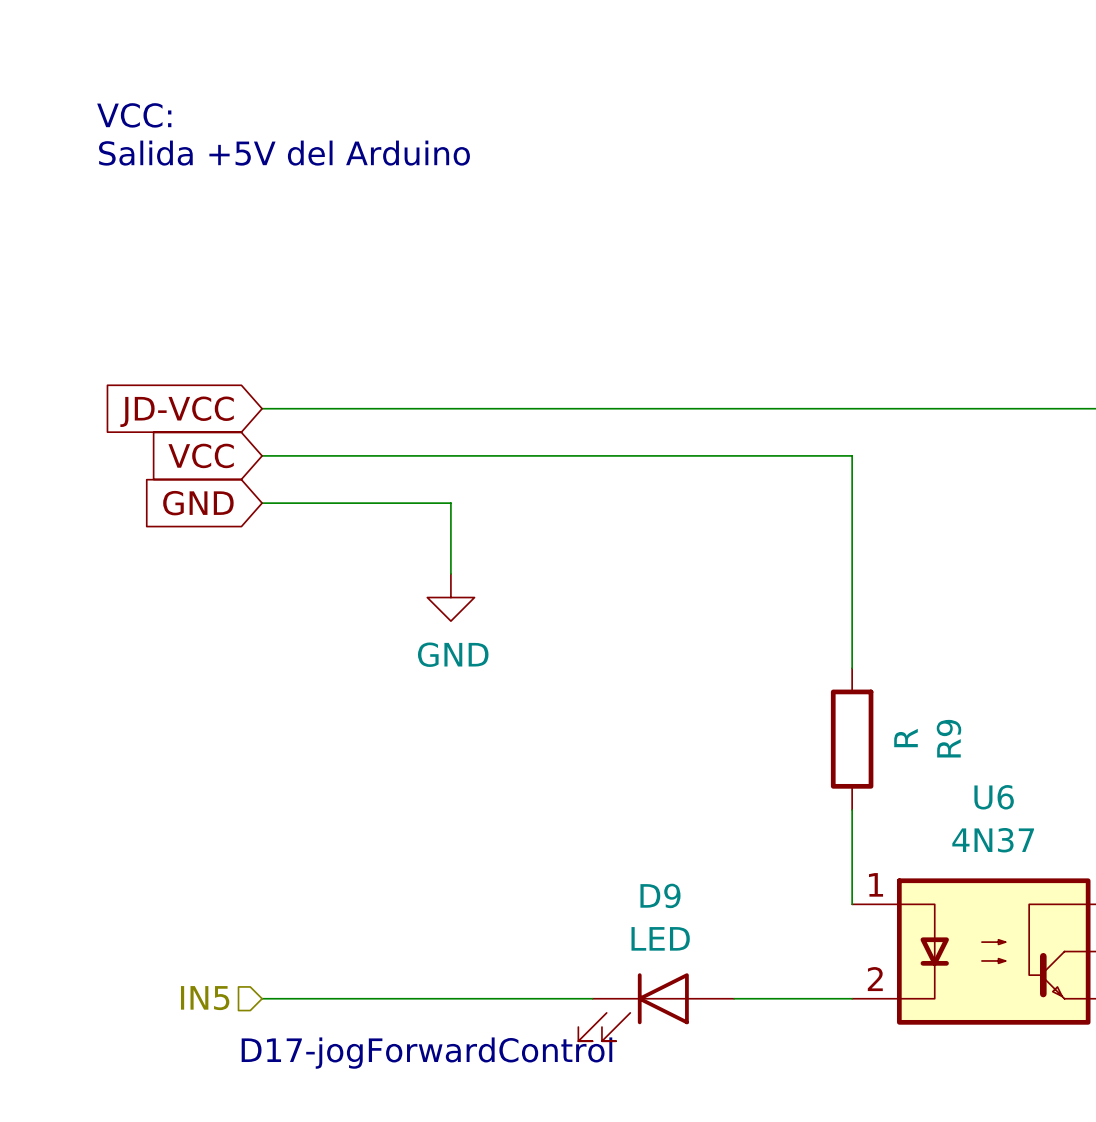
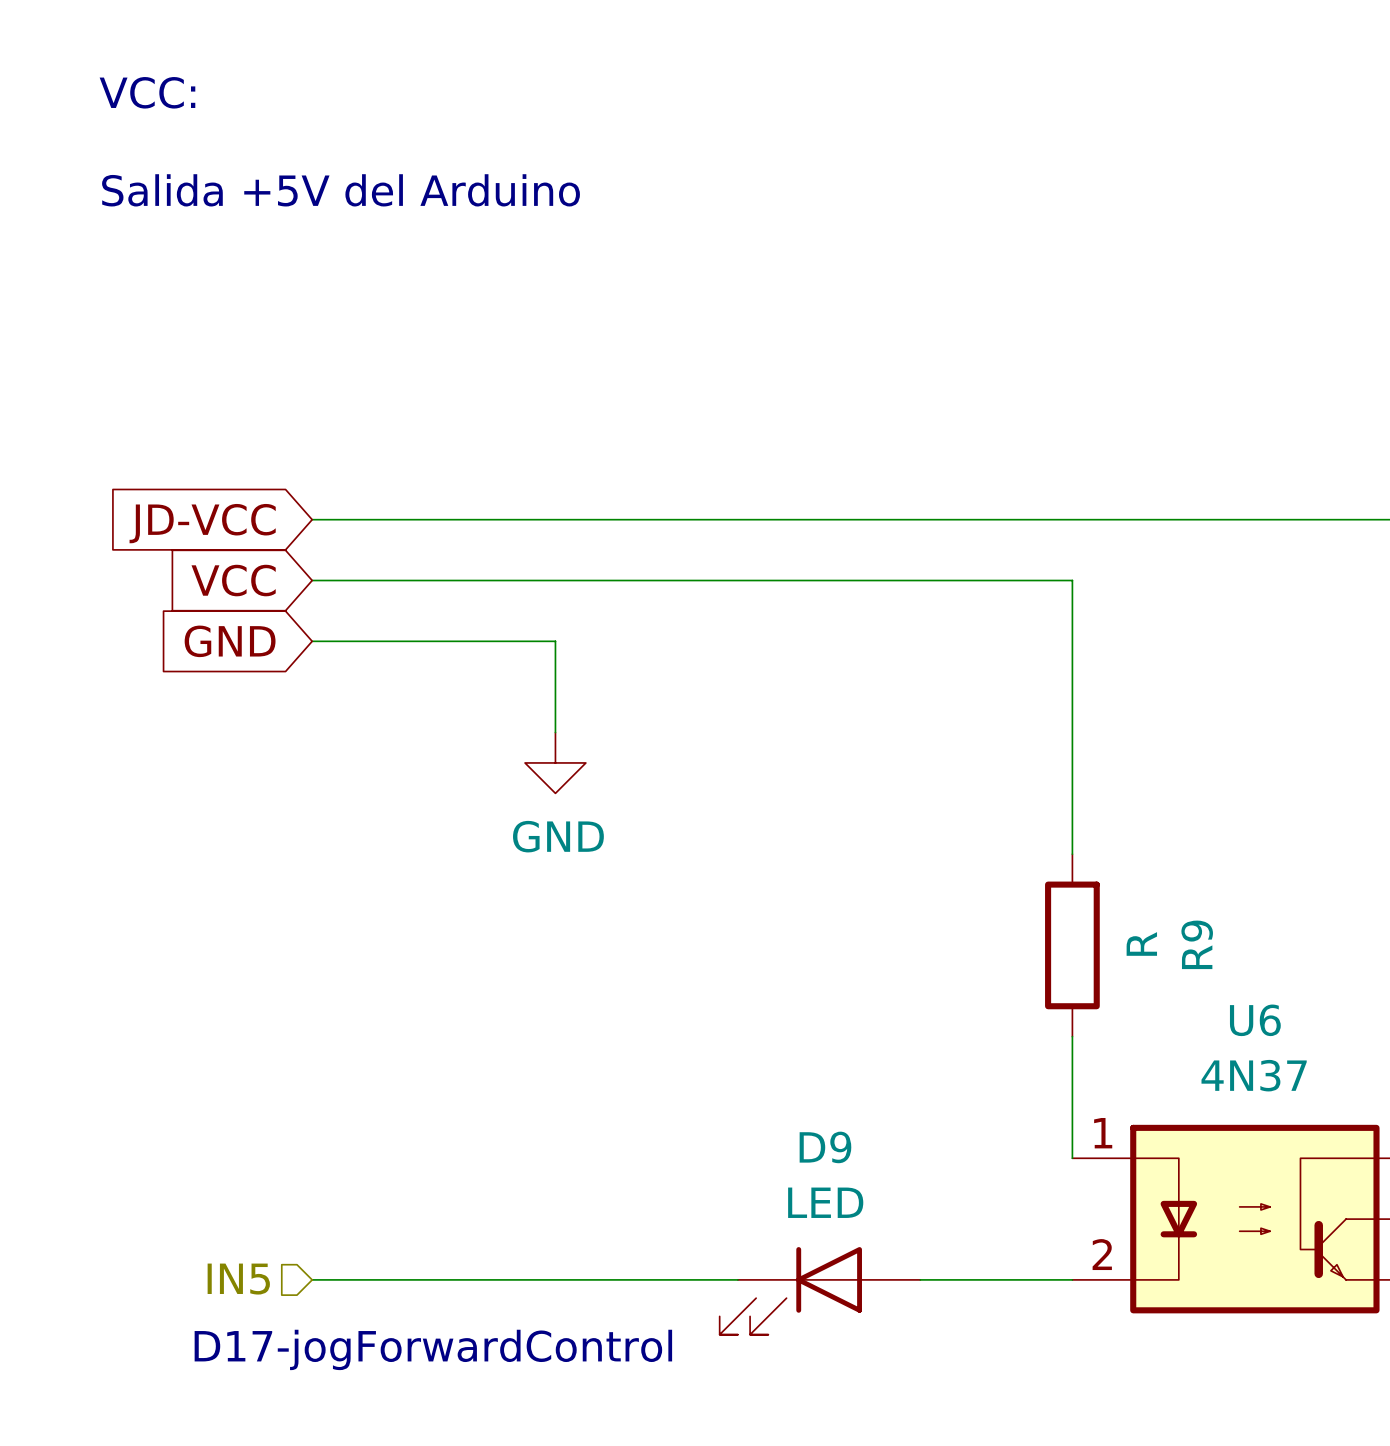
text position: VCC: (134, 115) -> VCC: (147, 92)
text position: D17-jogForwardControl (426, 1053) -> D17-jogForwardControl (433, 1349)

